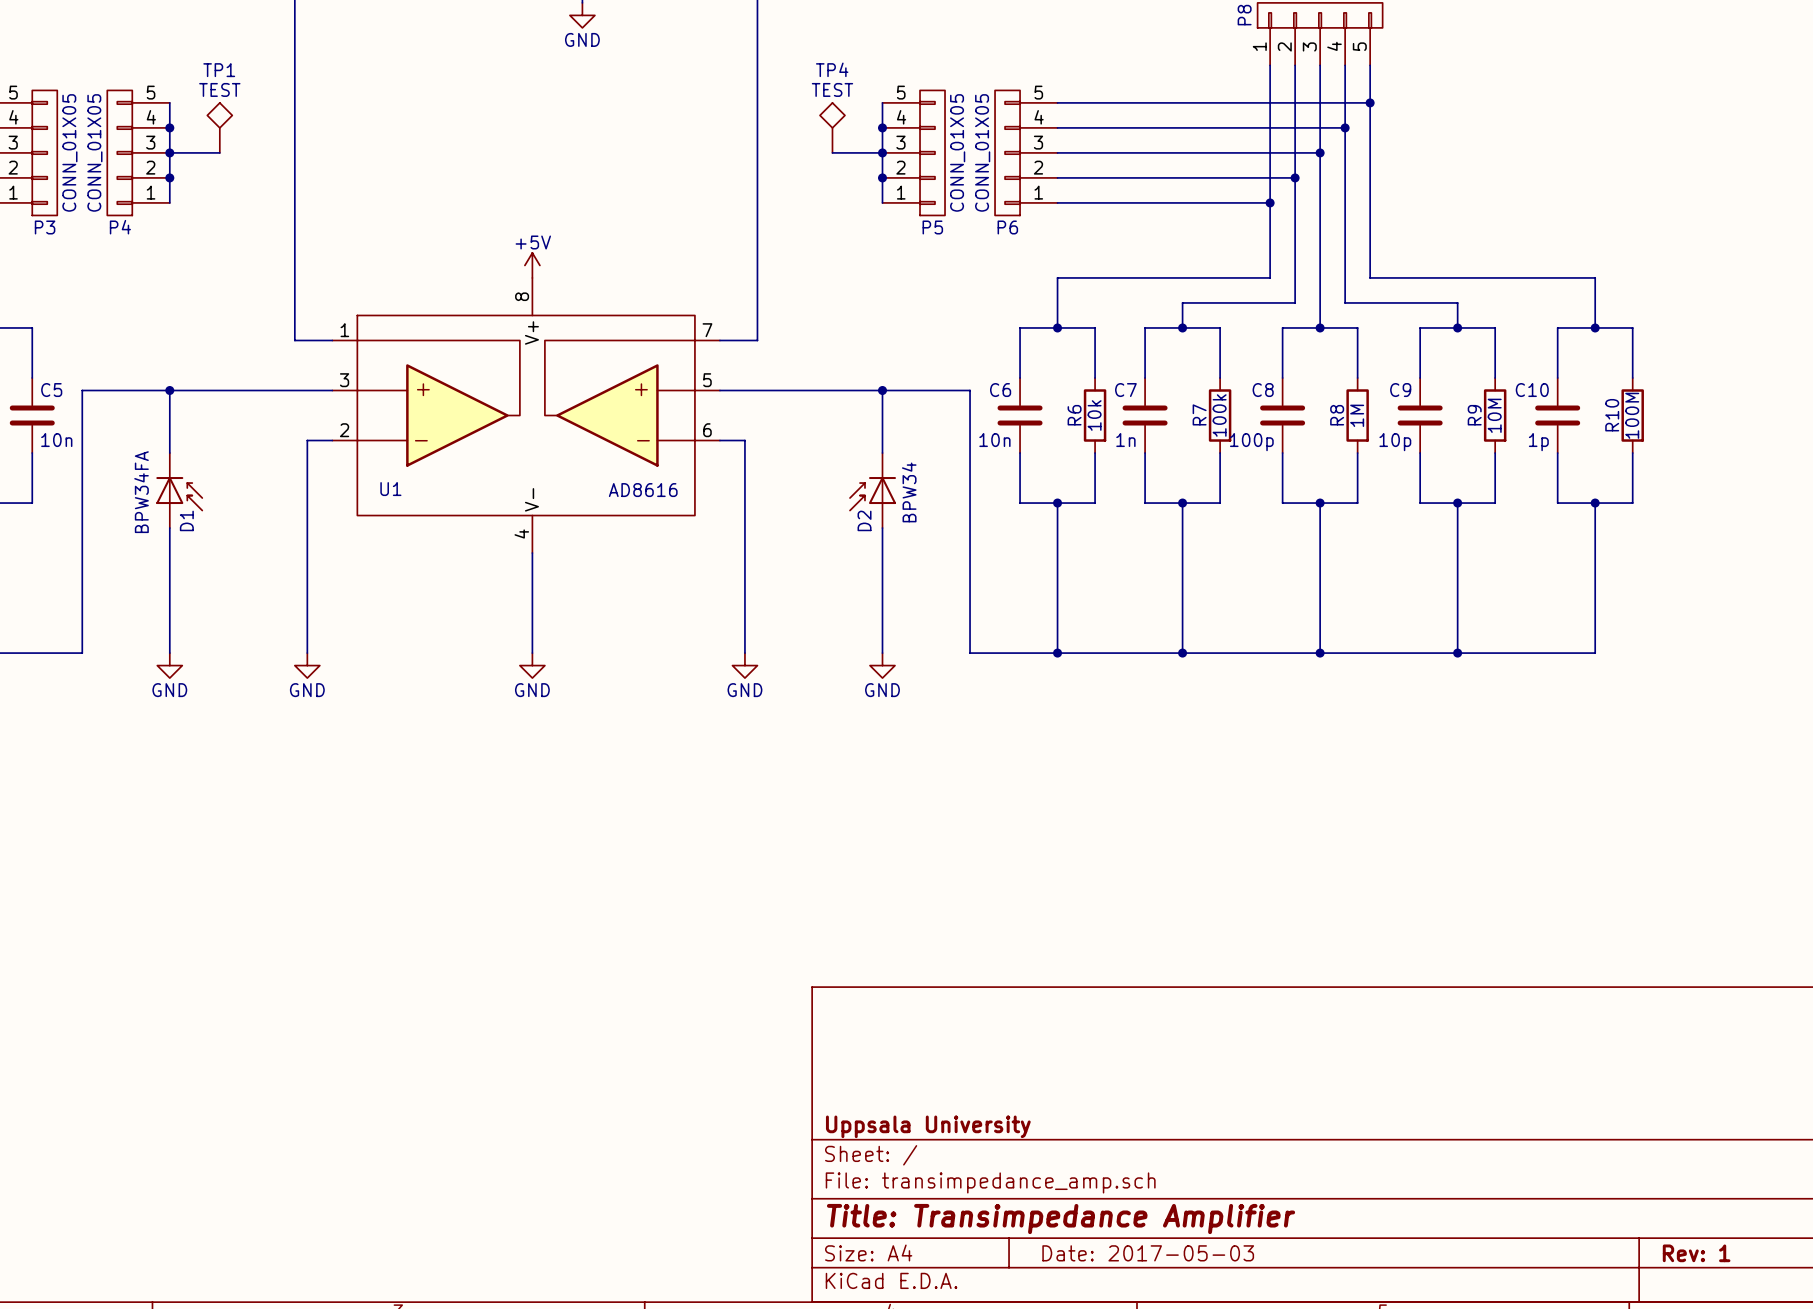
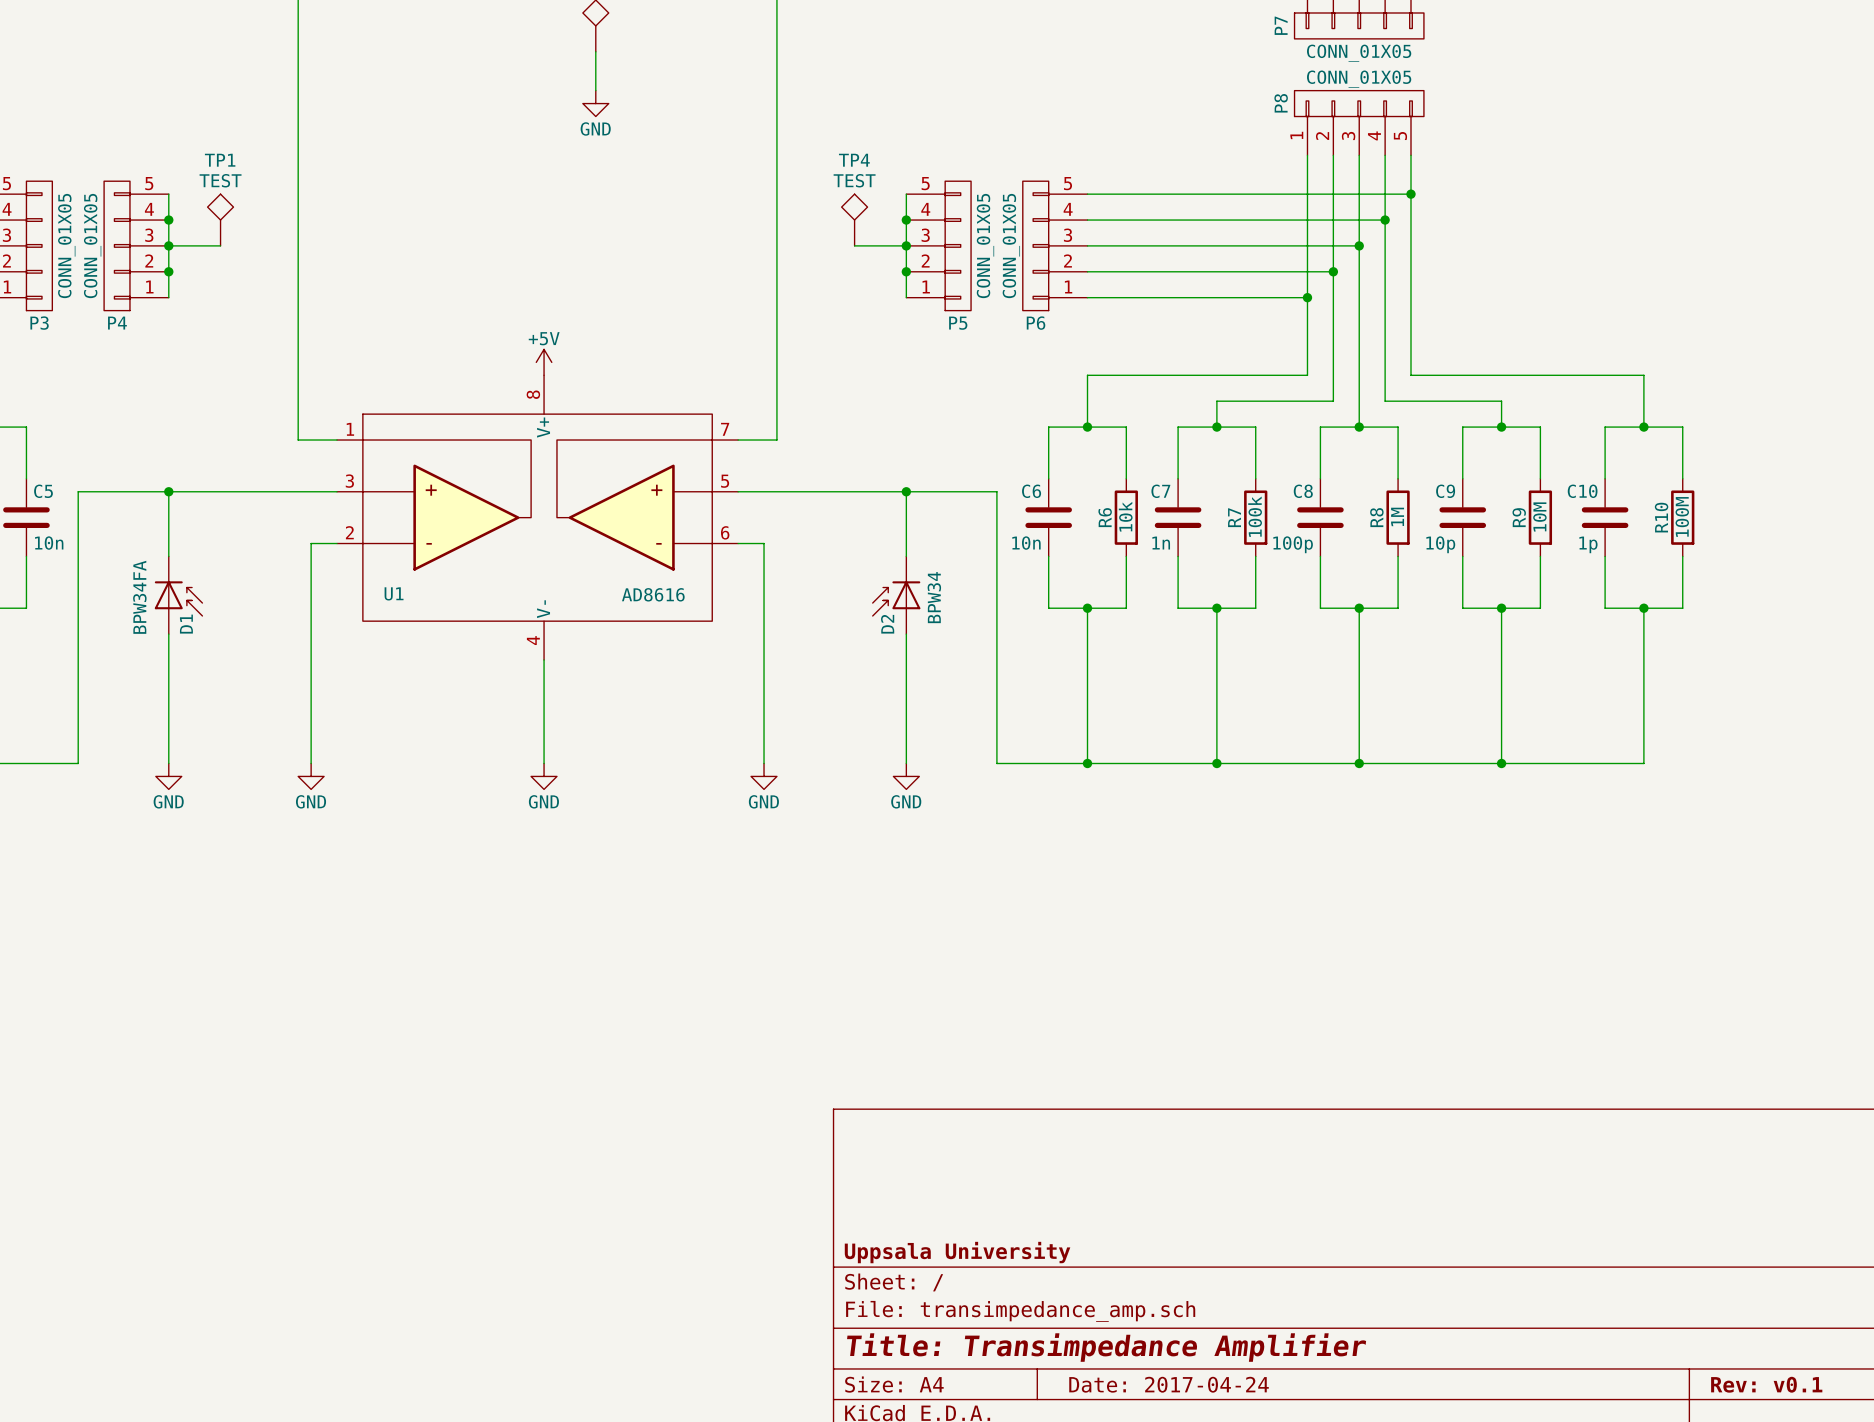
title block: Date: 2017-05-03 (1148, 1253) -> Date: 2017-04-24 (1169, 1384)
title block: Rev: 1 (1696, 1253) -> Rev: v0.1 (1766, 1384)

